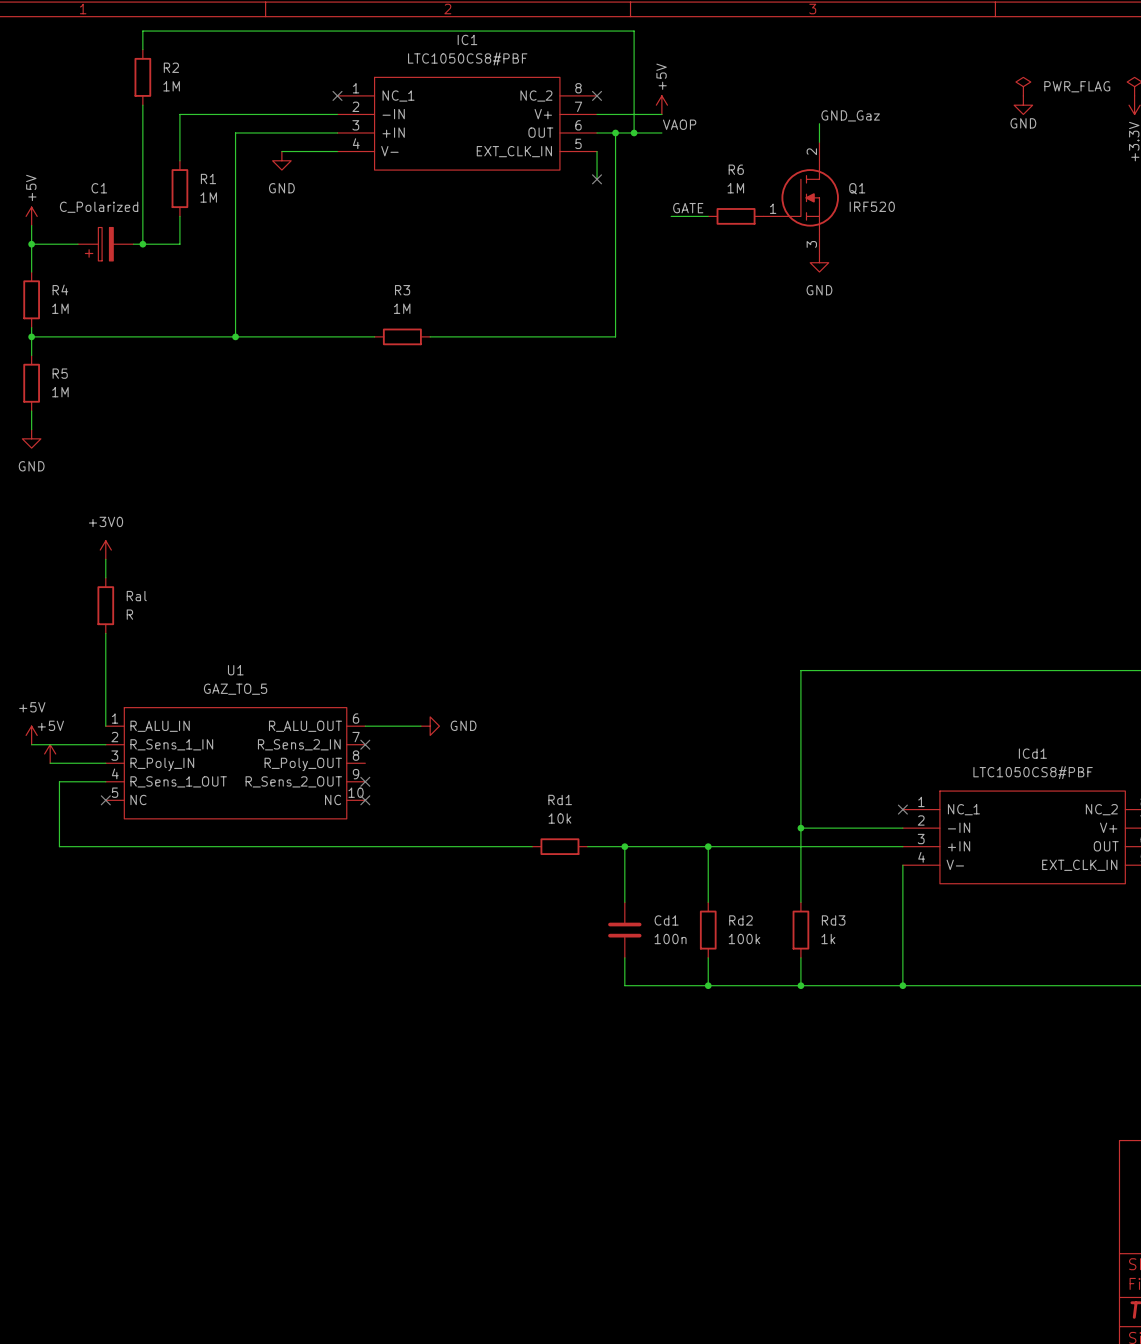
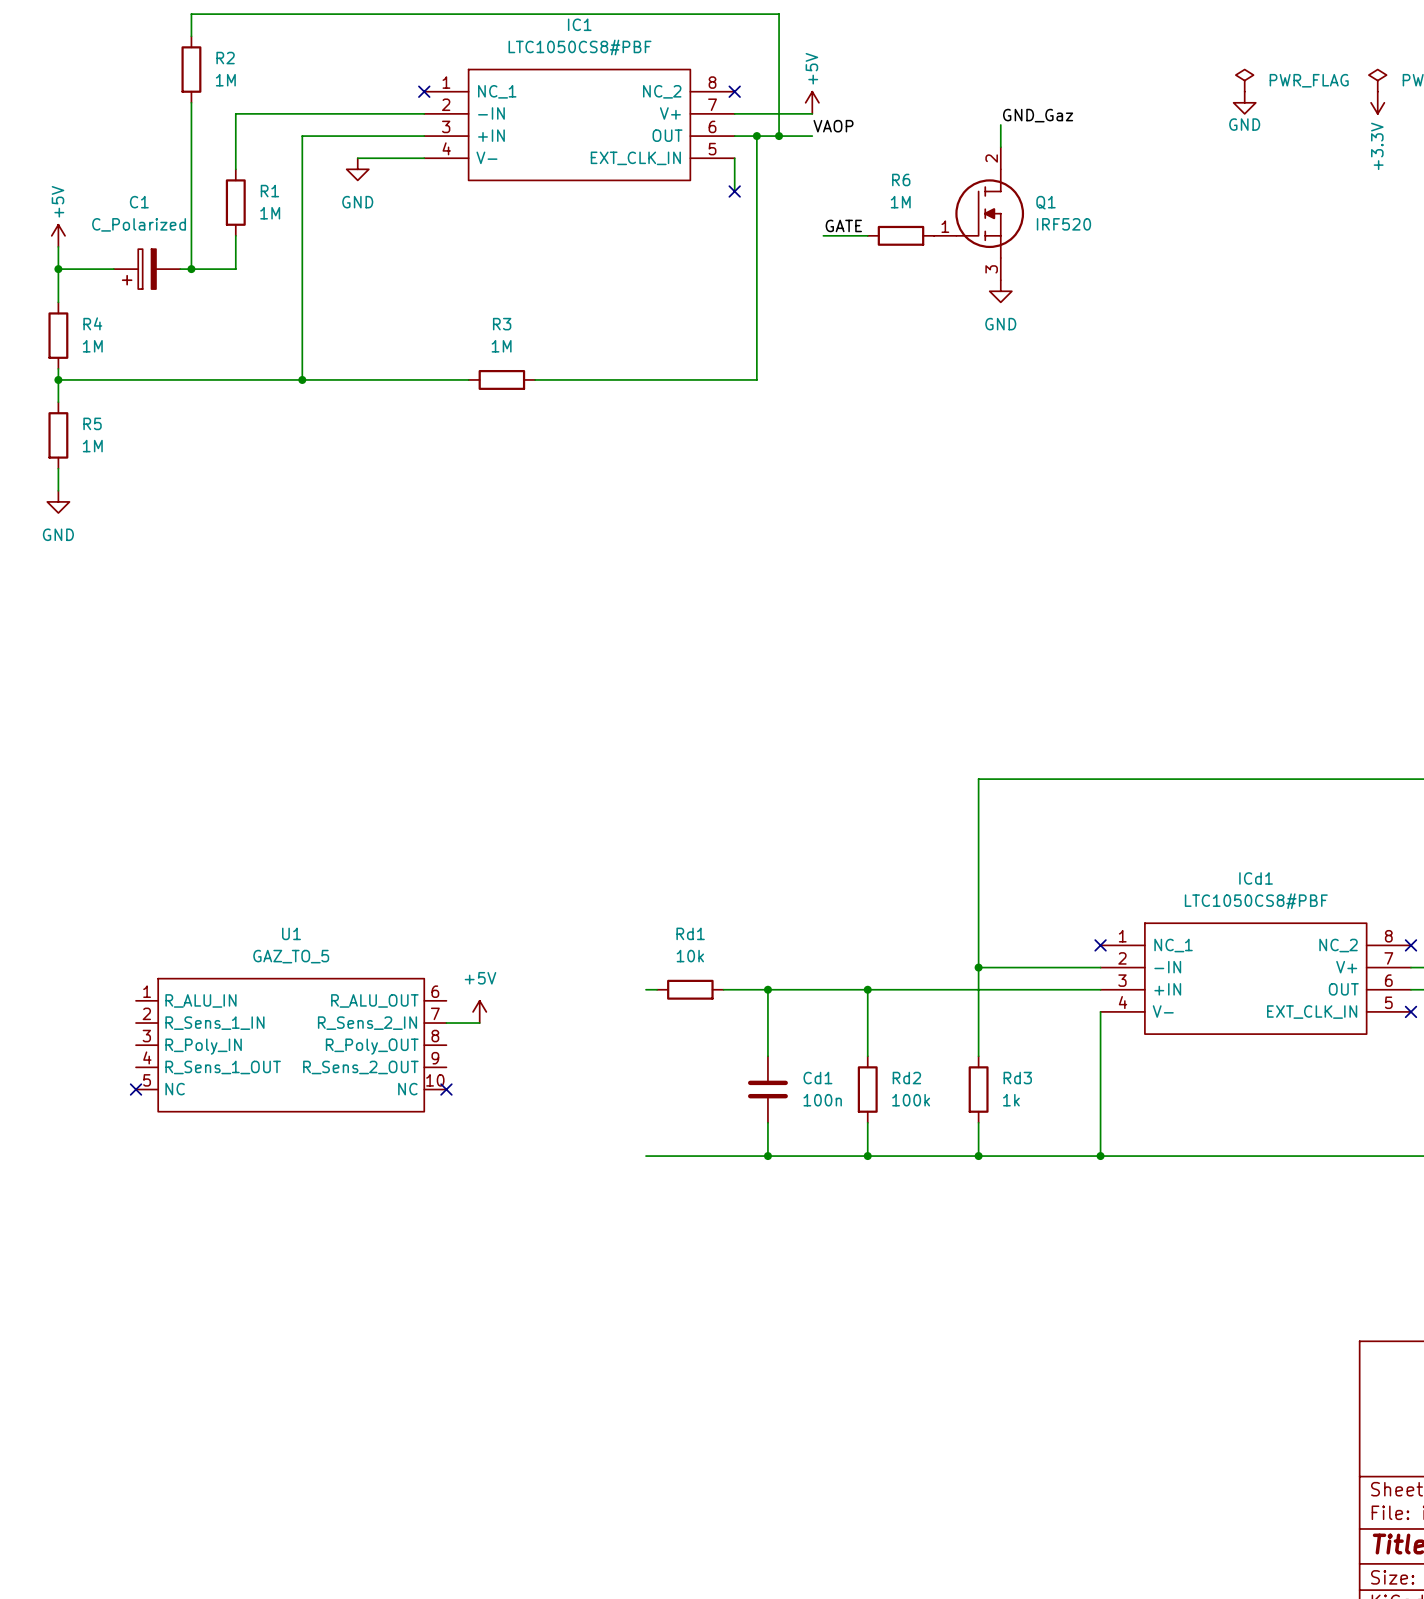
power symbol: +3V0 (105, 550) -> none
wire: (105, 559) (105, 577) -> none
Ral: R (105, 605) -> none
wire: (105, 633) (105, 726) -> none
wire: (365, 726) (420, 726) -> none
power symbol: GND (430, 726) -> none
power symbol: +5V (31, 735) -> none
wire: (31, 744) (105, 744) -> none
no-connect mark: (365, 744) -> none
power symbol: +5V (50, 753) -> none
wire: (50, 763) (105, 763) -> none
U1 position: (235, 763) -> (291, 1045)
wire: (105, 781) (59, 781) (59, 846) (522, 846) -> none
no-connect mark: (365, 781) -> none
no-connect mark: (105, 800) -> none
no-connect mark: (365, 800) -> none
power symbol: none -> +5V (479, 1011)
wire: none -> (446, 1023) (479, 1023)
no-connect mark: none -> (136, 1089)
no-connect mark: none -> (446, 1089)
wire: none -> (646, 1156) (767, 1156)
junction: none -> (767, 1156)

